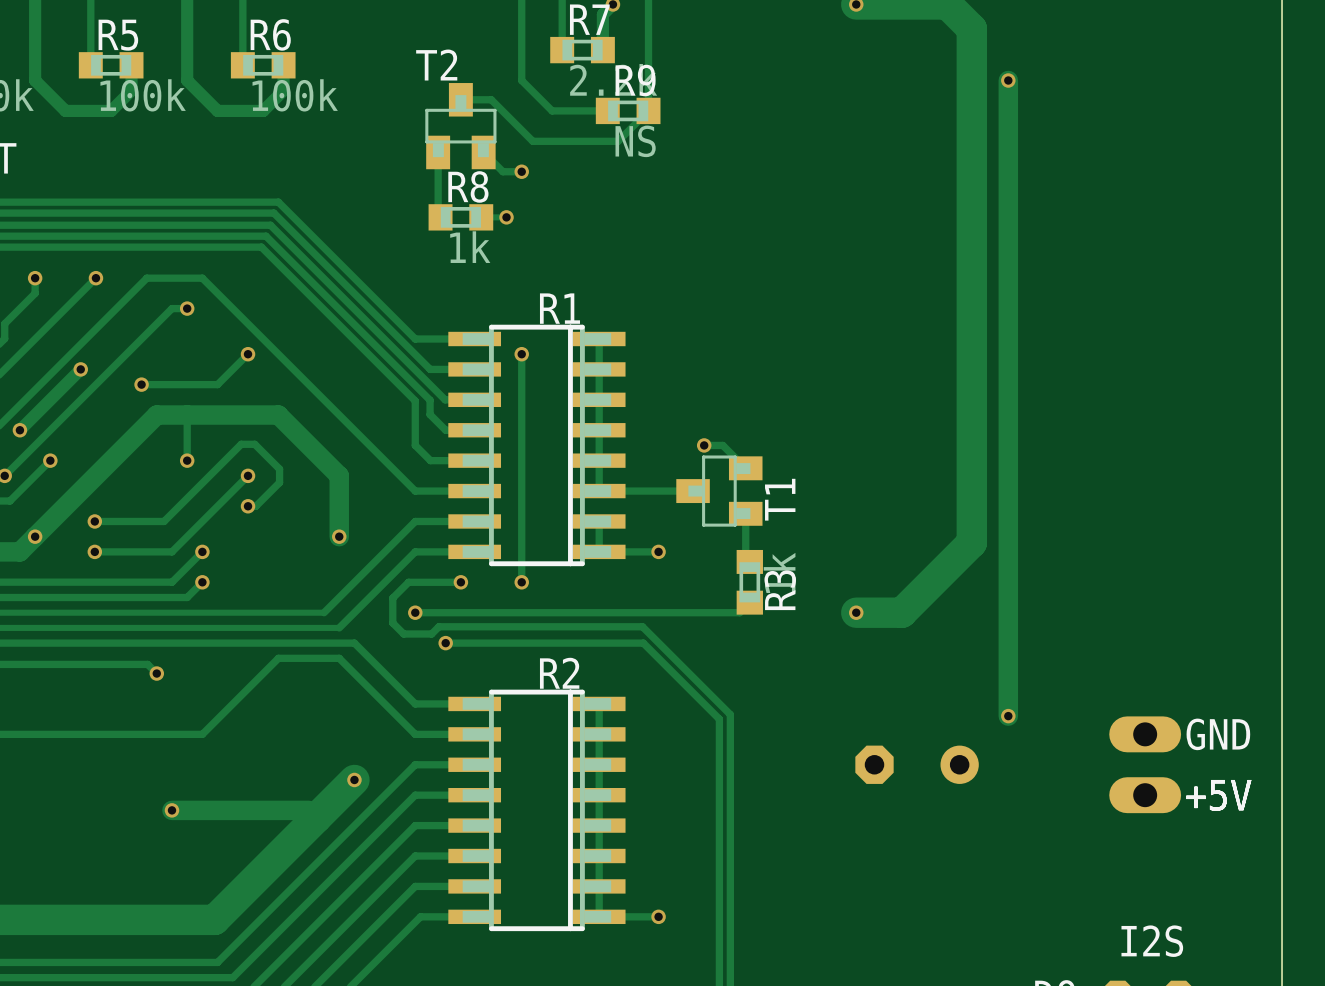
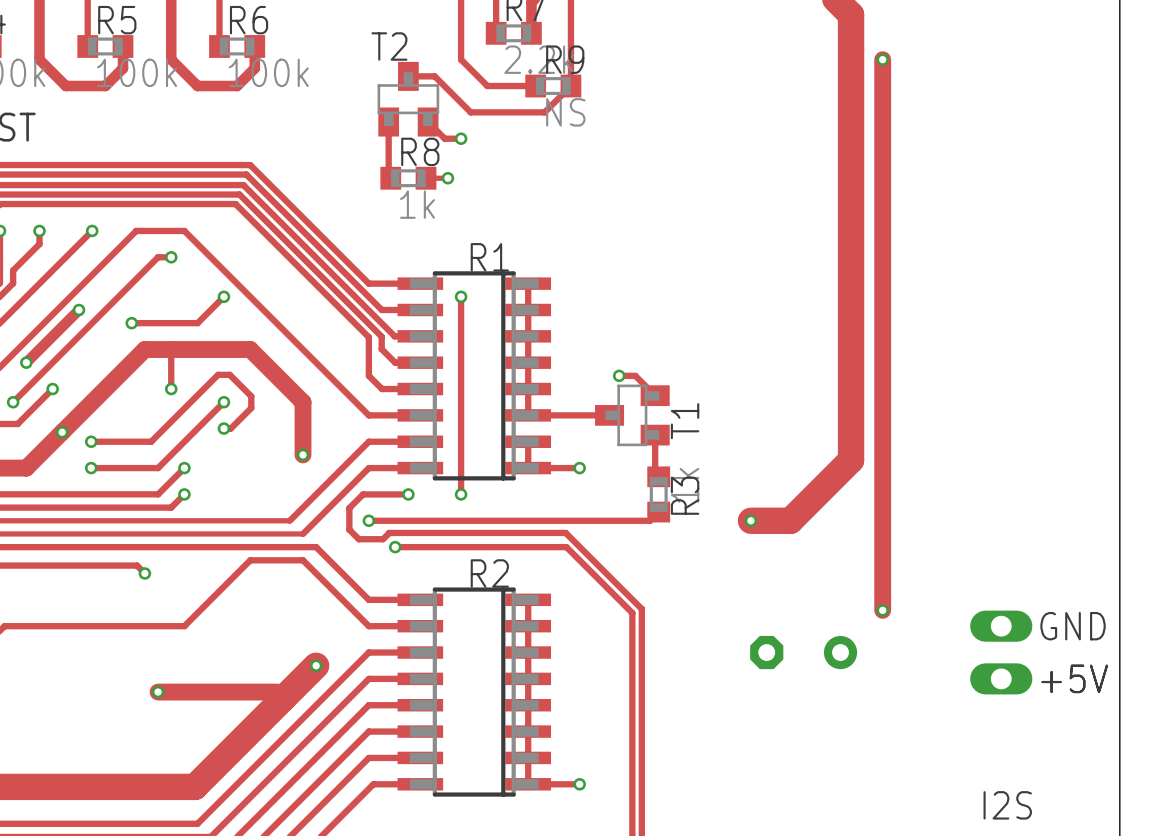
via position: (35, 536) -> (62, 432)

